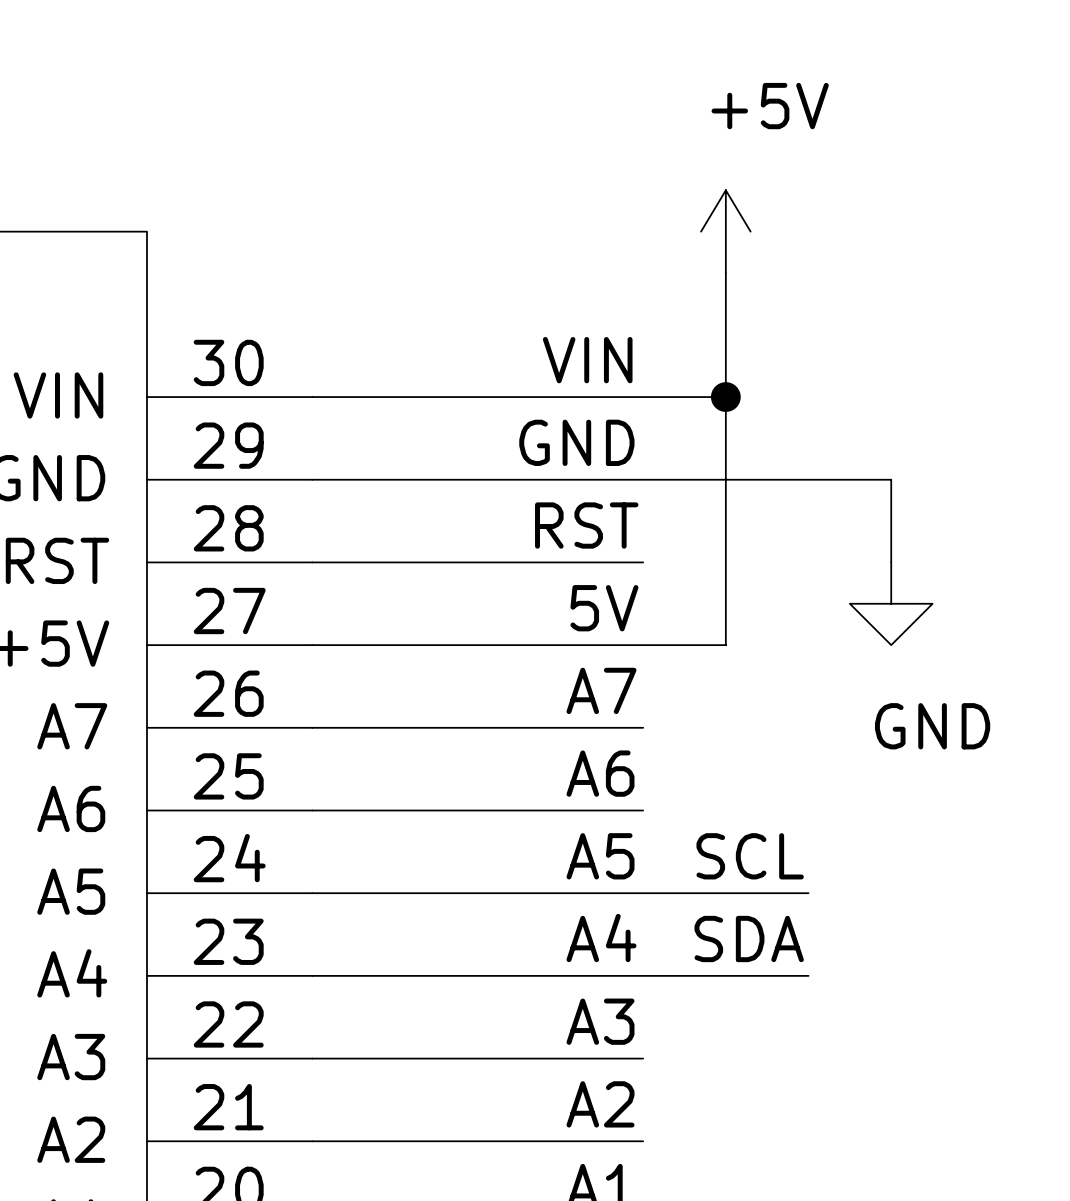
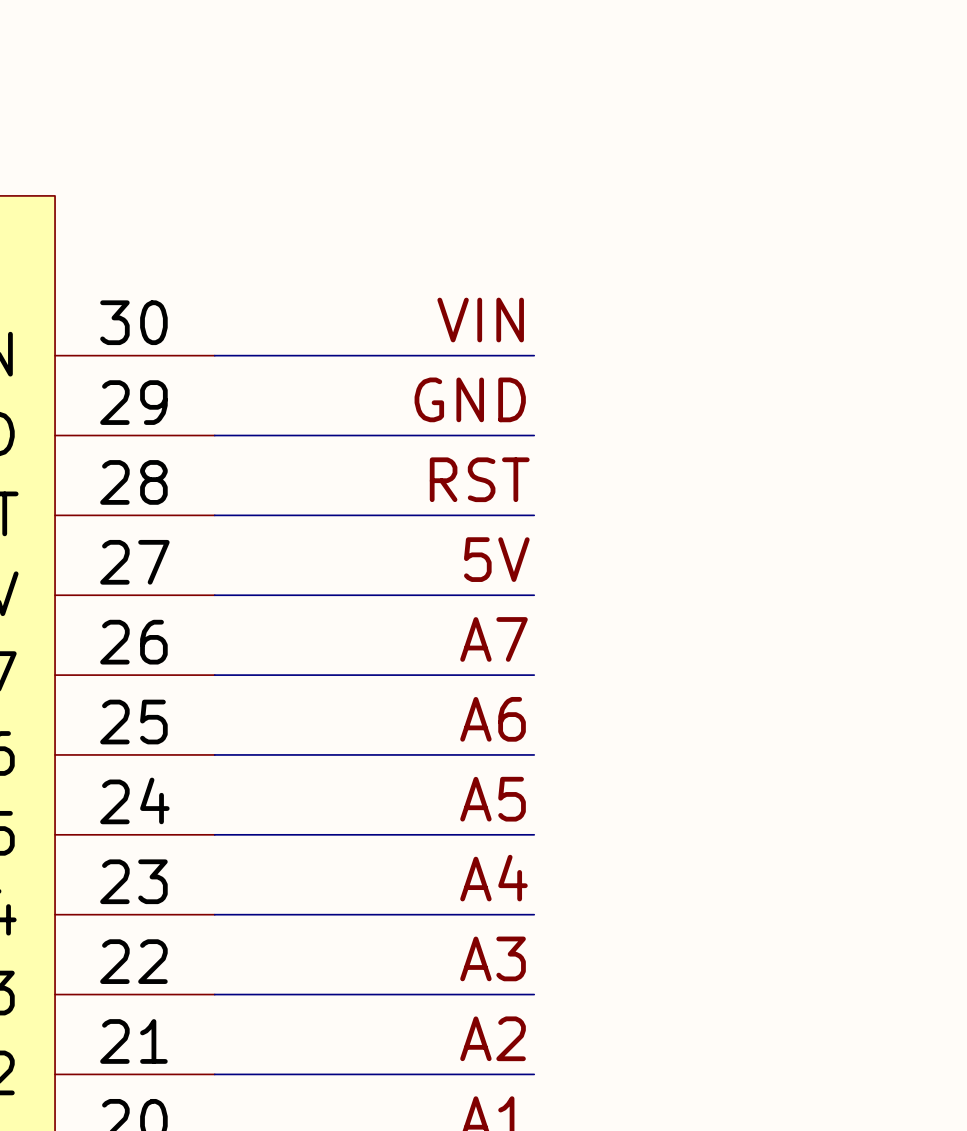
power symbol: +5V (725, 231) -> none
wire: (725, 273) (725, 645) (643, 645) -> none
wire: (643, 397) (725, 397) -> none
junction: (725, 397) -> none
wire: (643, 479) (891, 479) (891, 562) -> none
power symbol: GND (891, 603) -> none
label: SCL (750, 856) -> none
wire: (643, 893) (808, 893) -> none
label: SDA (749, 938) -> none
wire: (643, 975) (808, 975) -> none

